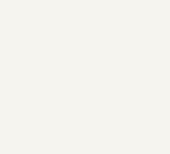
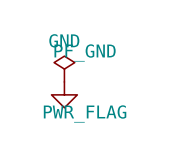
PF_GND: none -> PWR_FLAG (64, 69)
power symbol: none -> GND (64, 94)

